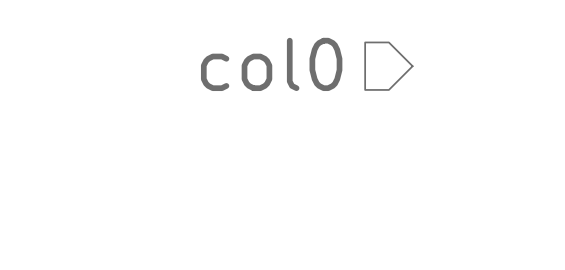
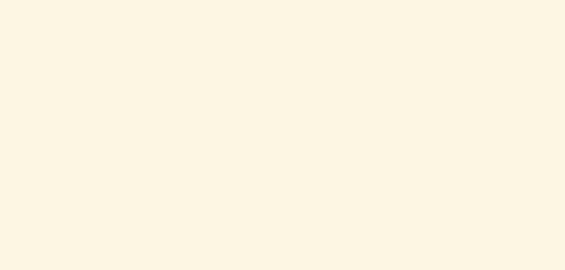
hierarchical label: col0 (271, 64) -> none

